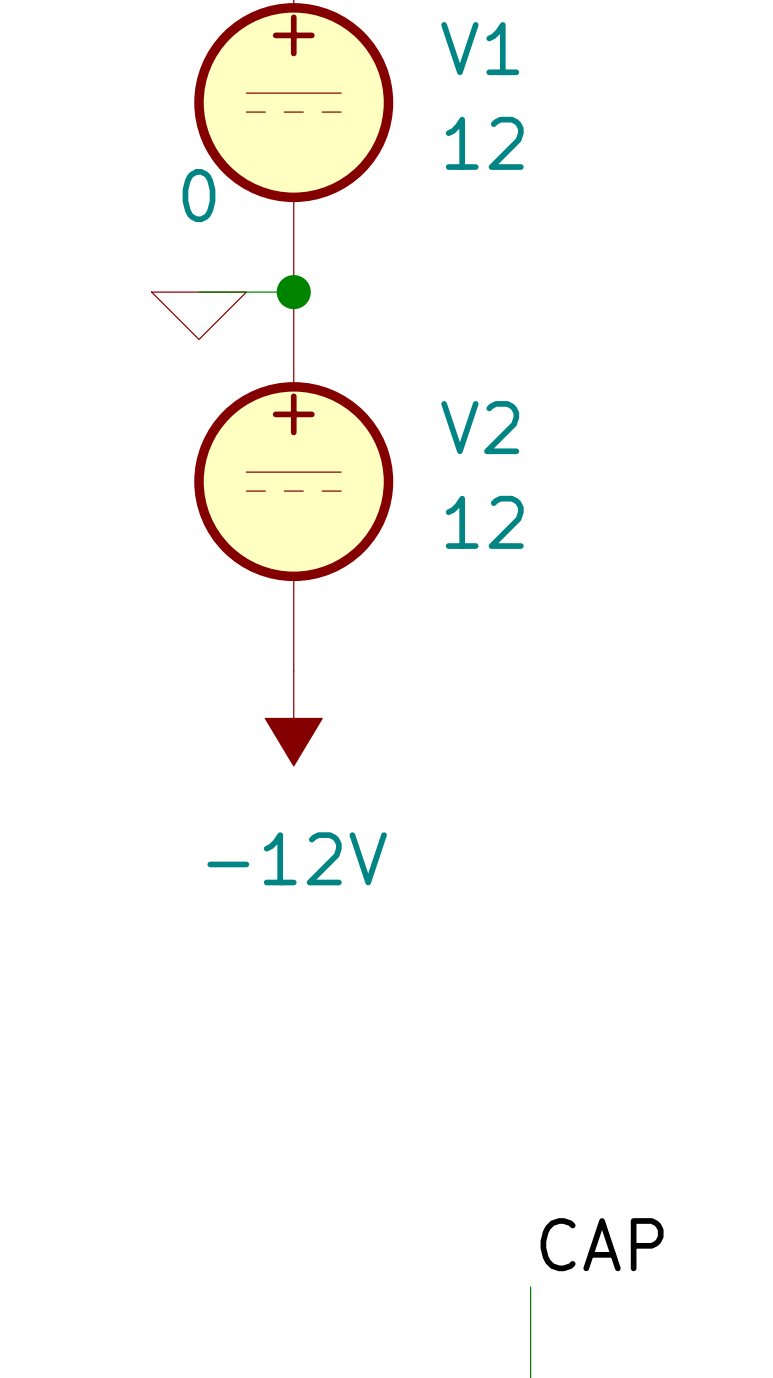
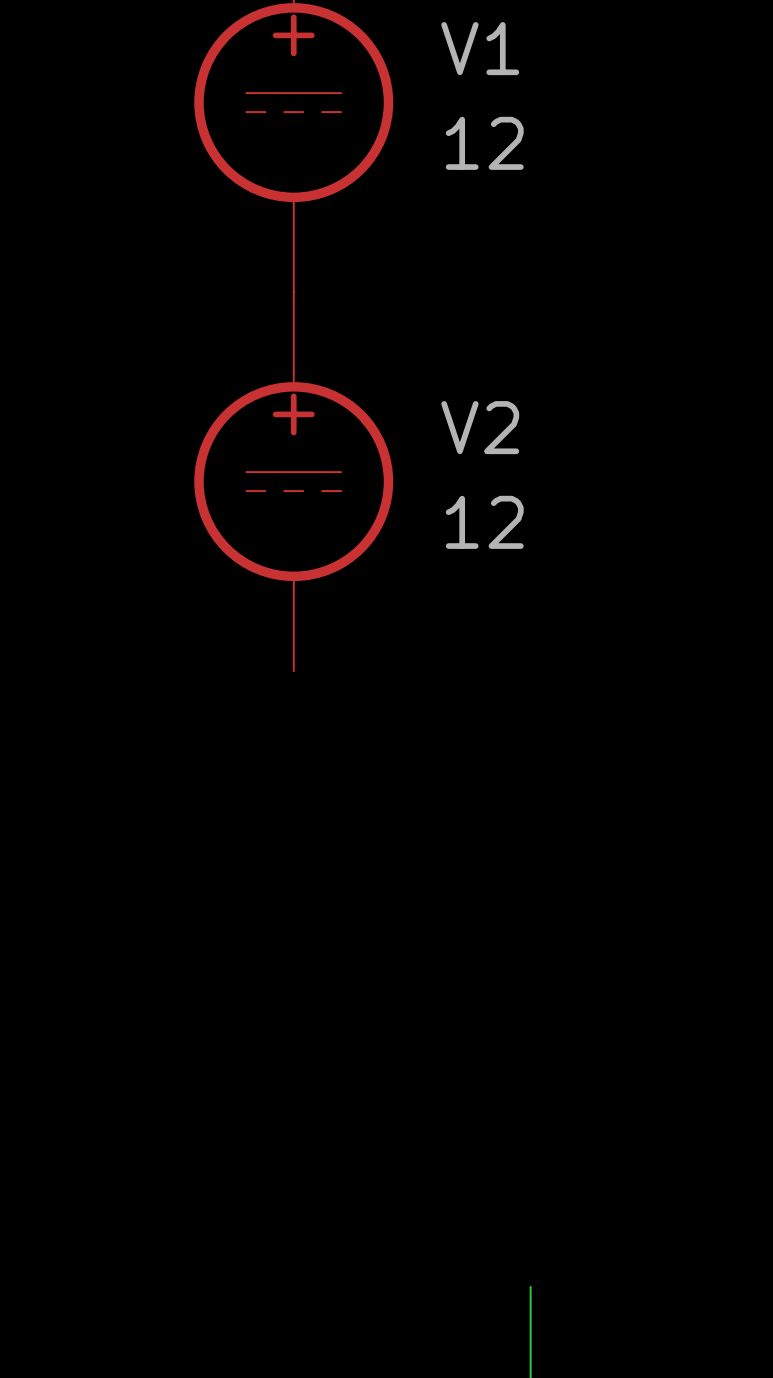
wire: (199, 292) (293, 292) -> none
junction: (293, 292) -> none
power symbol: 0 (199, 315) -> none
power symbol: -12V (293, 718) -> none
label: CAP (602, 1244) -> none

